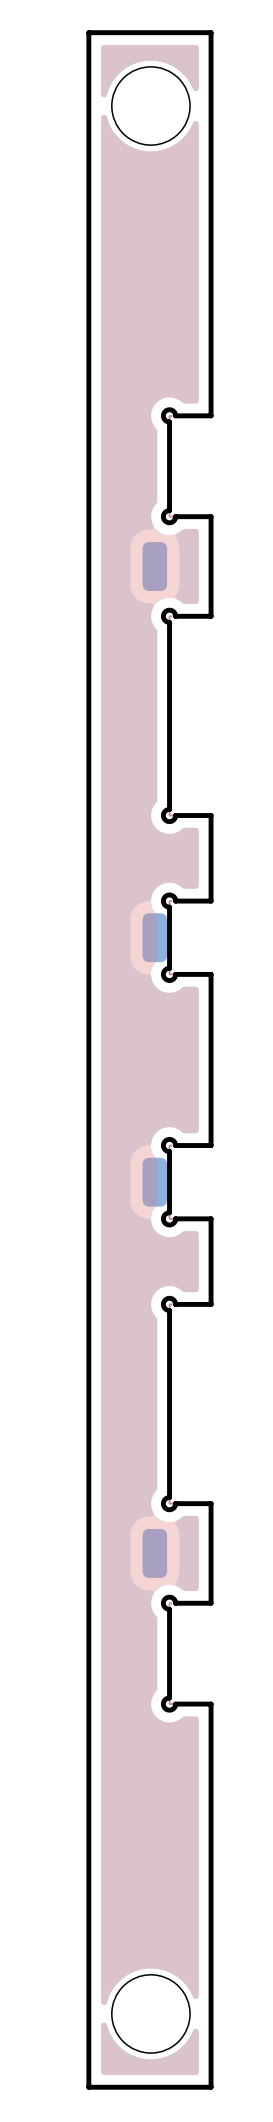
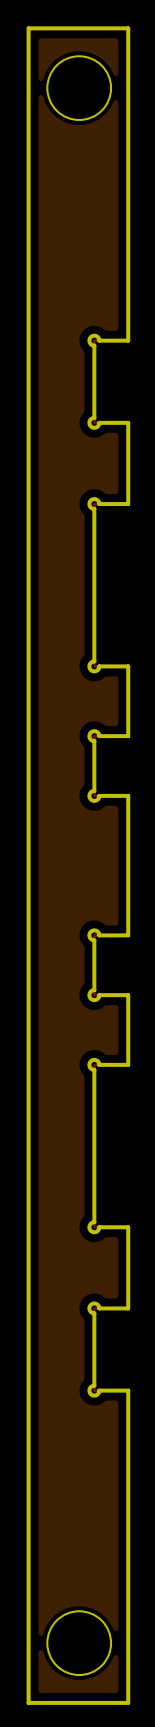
part: (154, 566) -> none
part: (154, 937) -> none
part: (154, 1182) -> none
part: (154, 1553) -> none

